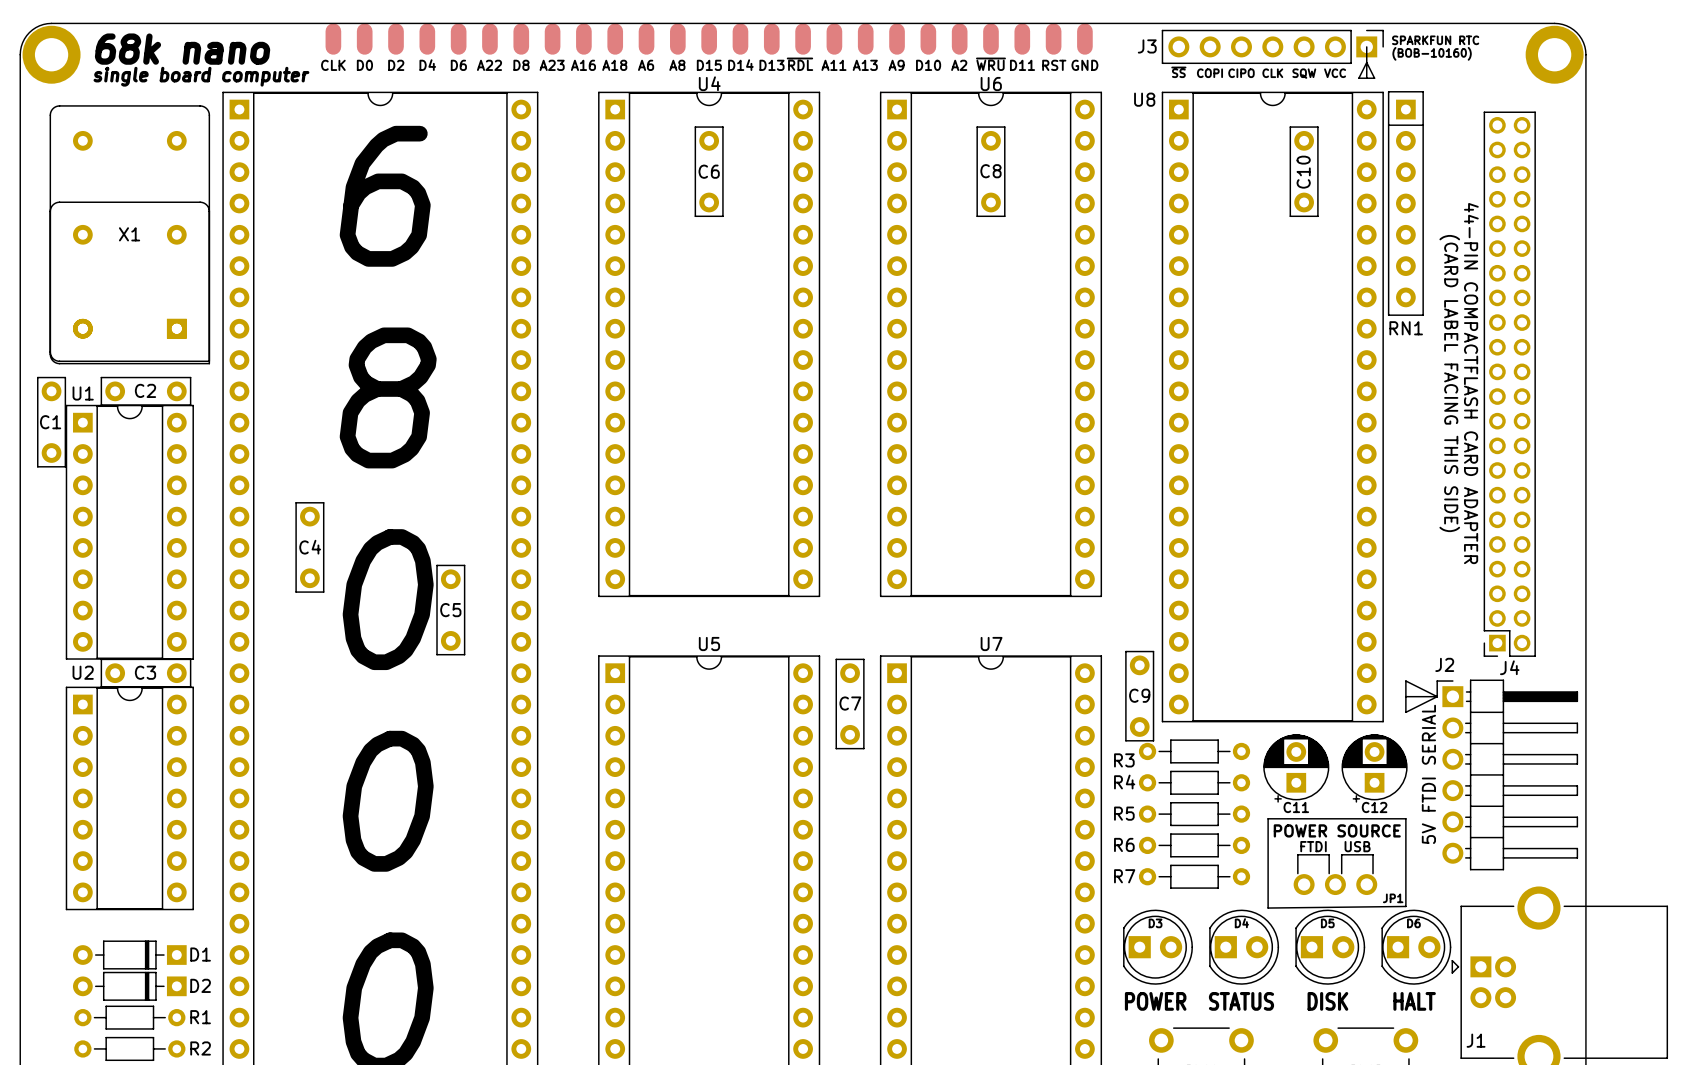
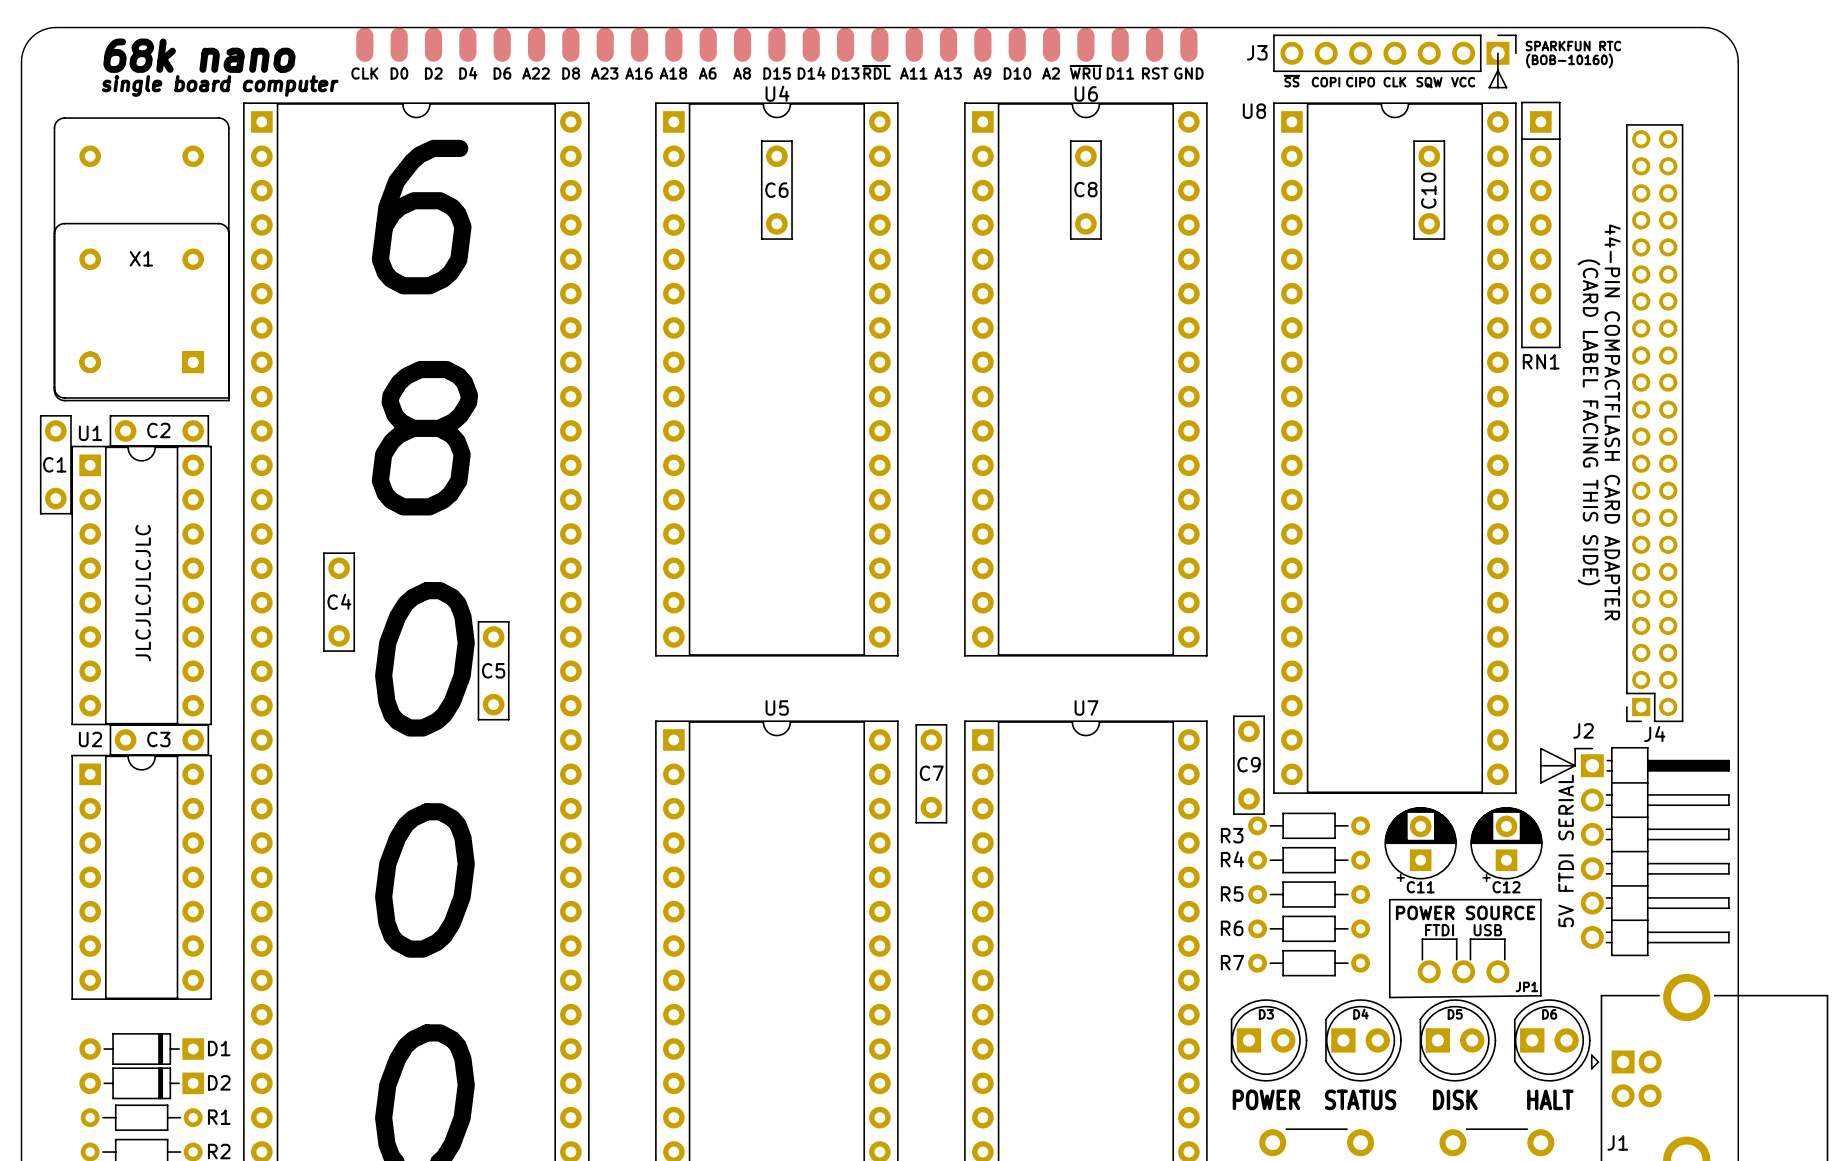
part: (51, 54) -> none
part: (1554, 54) -> none
text: none -> JLCJLCJLCJLC (143, 593)

